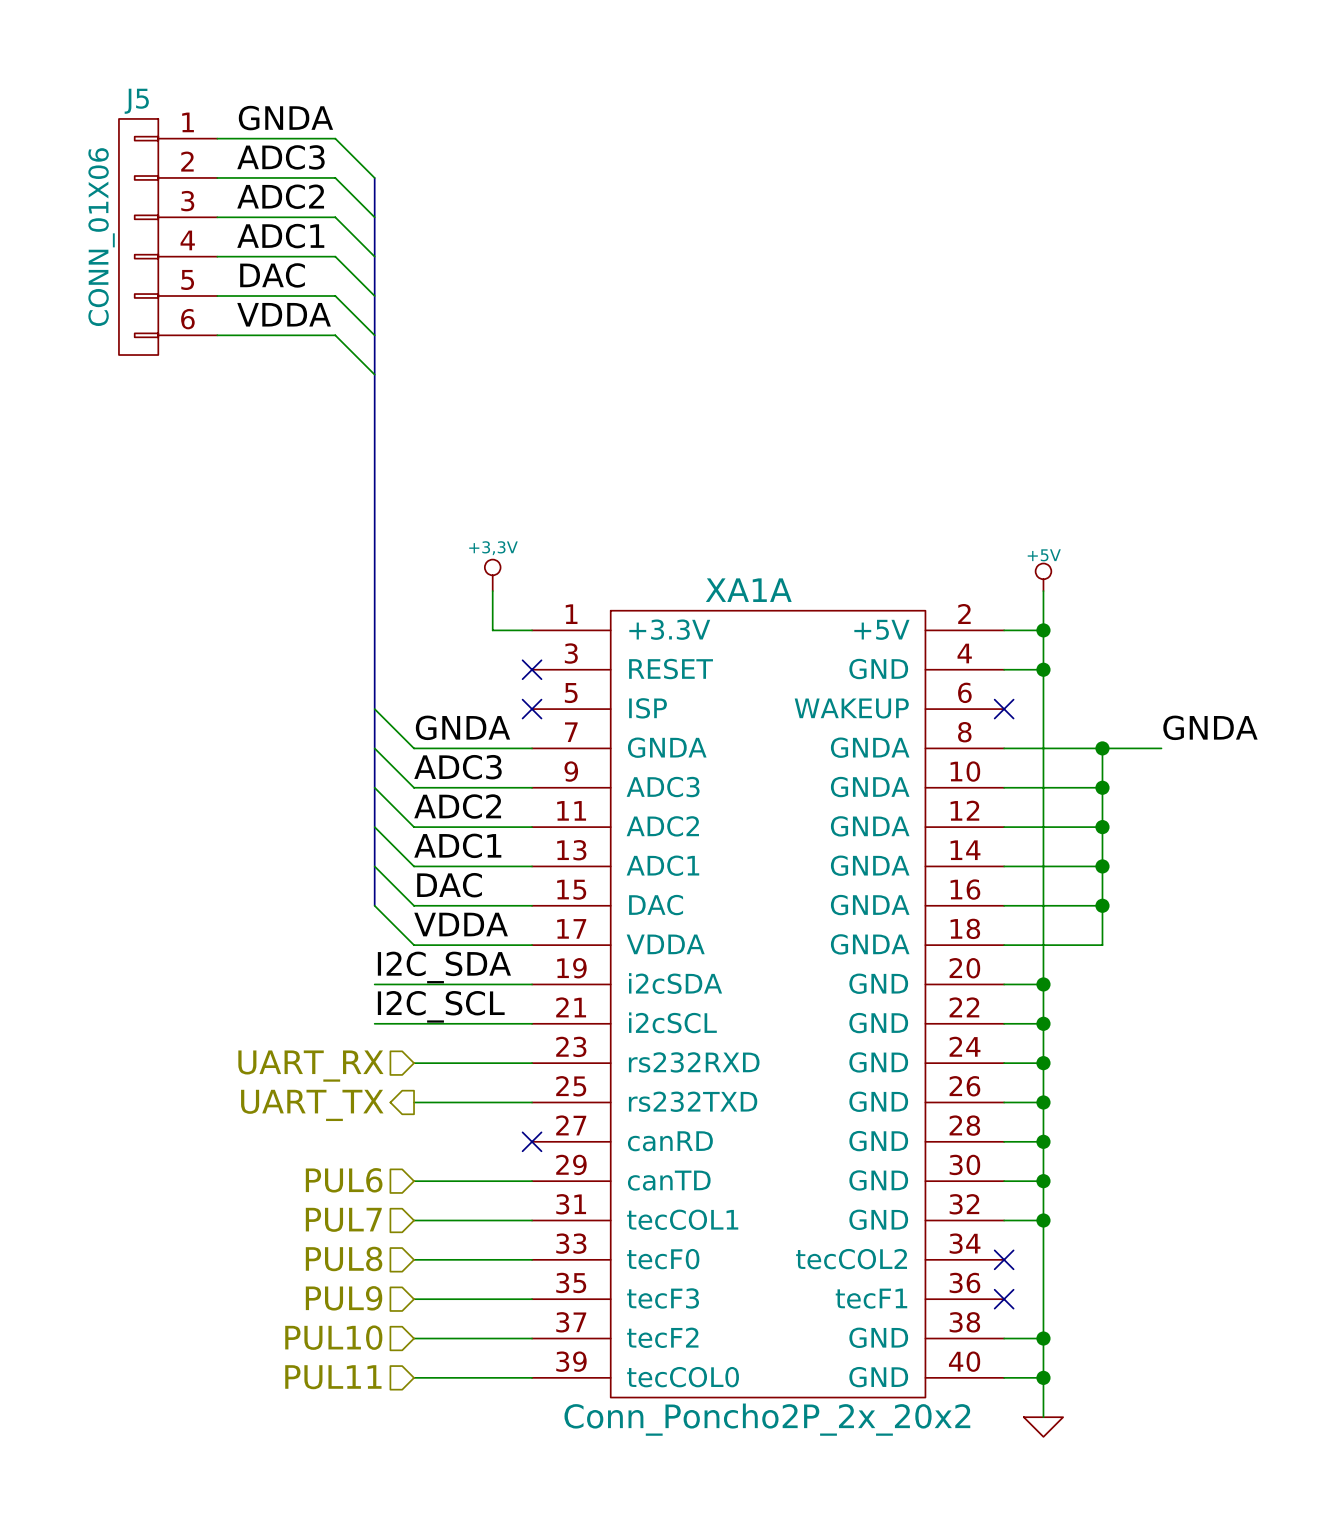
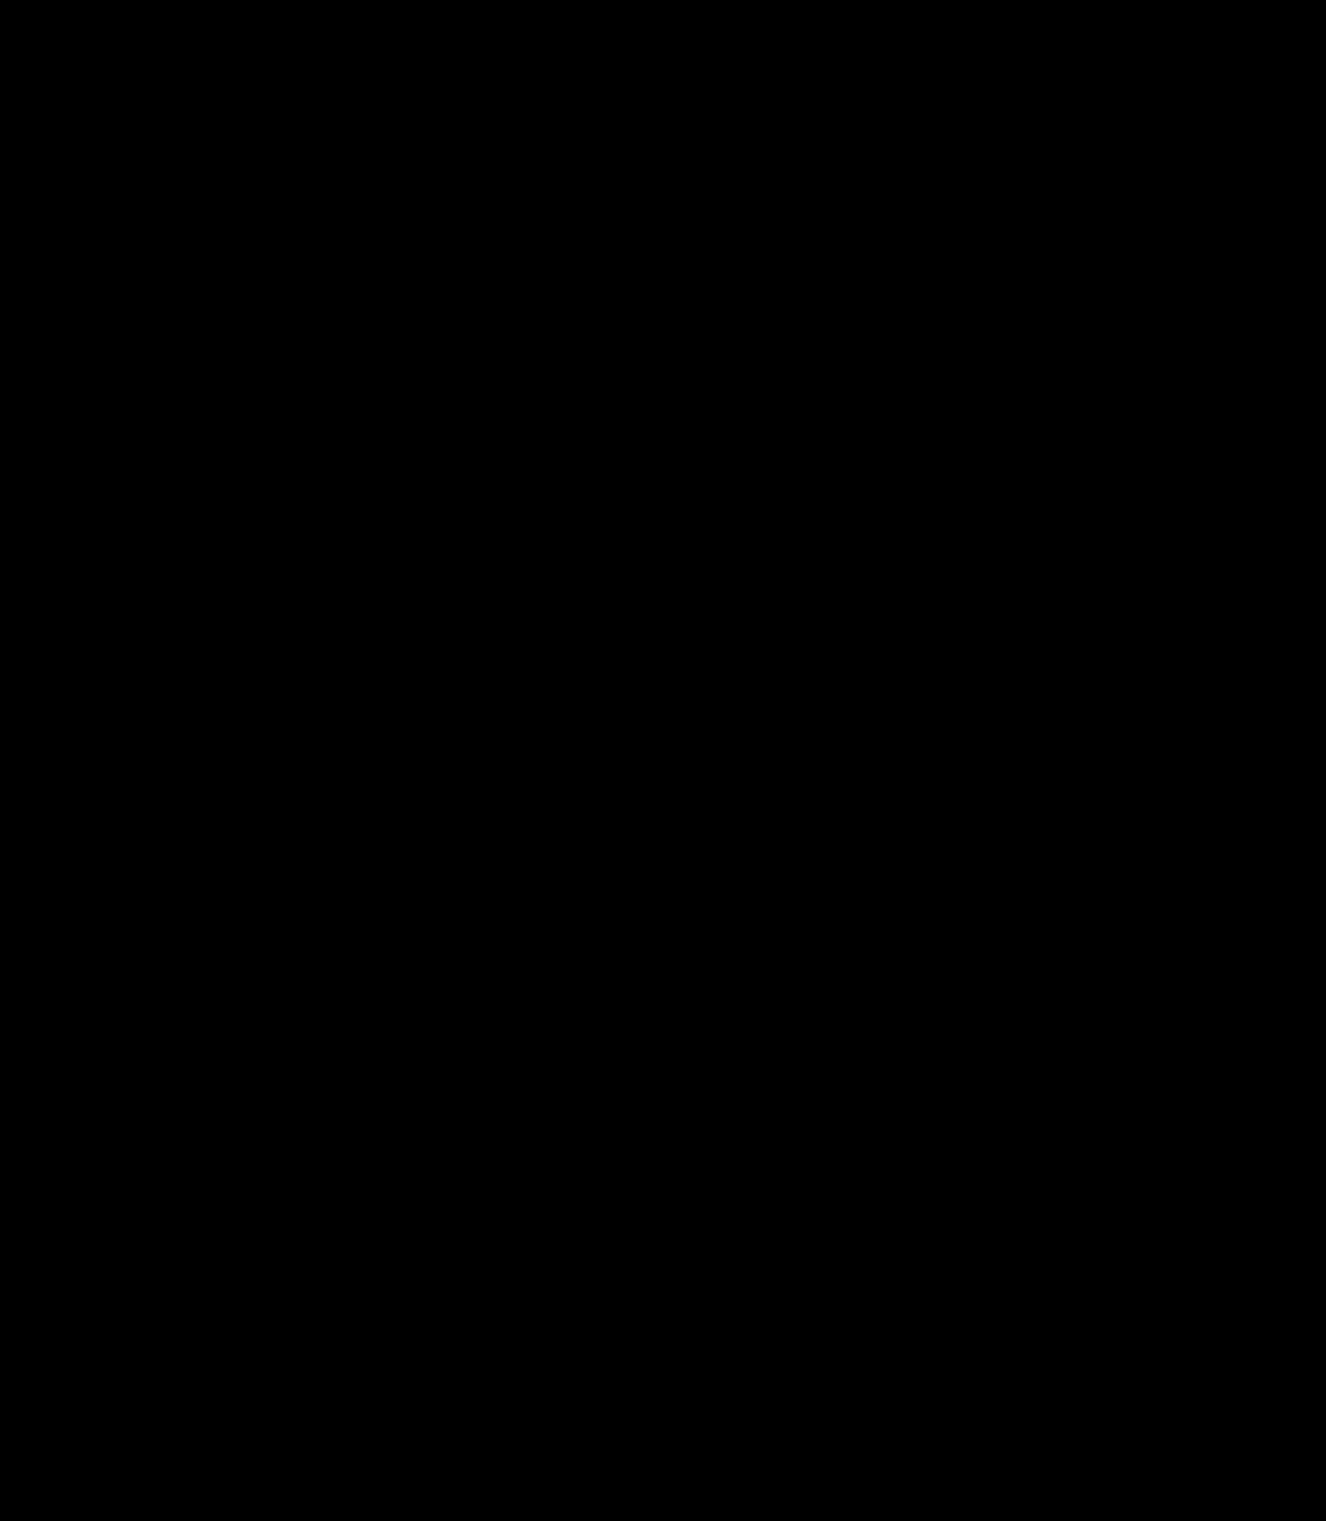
label: GNDA (285, 118) -> none
wire: (217, 138) (335, 138) (374, 177) -> none
label: ADC3 (280, 157) -> none
wire: (217, 177) (335, 177) (374, 217) -> none
bus: (374, 177) (374, 905) -> none
label: ADC2 (280, 196) -> none
wire: (217, 217) (335, 217) (374, 256) -> none
J5: CONN_01X06 (168, 236) -> none
label: ADC1 (280, 236) -> none
wire: (217, 256) (335, 256) (374, 296) -> none
label: DAC (272, 275) -> none
wire: (217, 296) (335, 296) (374, 335) -> none
label: VDDA (284, 314) -> none
wire: (217, 335) (335, 335) (374, 374) -> none
power symbol: +3,3V (492, 575) -> none
power symbol: +5V (1043, 577) -> none
wire: (492, 591) (492, 630) (532, 630) -> none
wire: (1043, 591) (1043, 1417) -> none
wire: (1004, 630) (1043, 630) -> none
junction: (1043, 630) -> none
no-connect mark: (532, 669) -> none
wire: (1004, 669) (1043, 669) -> none
junction: (1043, 669) -> none
wire: (374, 709) (414, 748) (532, 748) -> none
no-connect mark: (532, 709) -> none
no-connect mark: (1004, 709) -> none
label: GNDA (462, 727) -> none
label: GNDA (1210, 727) -> none
wire: (374, 748) (414, 787) (532, 787) -> none
wire: (1004, 748) (1161, 748) -> none
wire: (1102, 748) (1102, 945) (1004, 945) -> none
junction: (1102, 748) -> none
label: ADC3 (457, 767) -> none
wire: (374, 787) (414, 827) (532, 827) -> none
wire: (1004, 787) (1102, 787) -> none
junction: (1102, 787) -> none
label: ADC2 (457, 806) -> none
wire: (374, 827) (414, 866) (532, 866) -> none
wire: (1004, 827) (1102, 827) -> none
junction: (1102, 827) -> none
label: ADC1 (457, 845) -> none
wire: (374, 866) (414, 905) (532, 905) -> none
wire: (1004, 866) (1102, 866) -> none
junction: (1102, 866) -> none
label: DAC (449, 885) -> none
wire: (374, 905) (414, 945) (532, 945) -> none
wire: (1004, 905) (1102, 905) -> none
junction: (1102, 905) -> none
label: VDDA (461, 924) -> none
label: I2C_SDA (444, 967) -> none
wire: (374, 984) (532, 984) -> none
wire: (1004, 984) (1043, 984) -> none
junction: (1043, 984) -> none
XA1A: Conn_Poncho2P_2x_20x2 (768, 1004) -> none
label: I2C_SCL (441, 1006) -> none
wire: (374, 1023) (532, 1023) -> none
wire: (1004, 1023) (1043, 1023) -> none
junction: (1043, 1023) -> none
wire: (414, 1063) (532, 1063) -> none
wire: (1004, 1063) (1043, 1063) -> none
junction: (1043, 1063) -> none
hierarchical label: UART_RX (310, 1066) -> none
wire: (414, 1102) (532, 1102) -> none
wire: (1004, 1102) (1043, 1102) -> none
junction: (1043, 1102) -> none
hierarchical label: UART_TX (312, 1105) -> none
no-connect mark: (532, 1141) -> none
wire: (1004, 1141) (1043, 1141) -> none
junction: (1043, 1141) -> none
hierarchical label: PUL6 (344, 1180) -> none
wire: (414, 1181) (532, 1181) -> none
wire: (1004, 1181) (1043, 1181) -> none
junction: (1043, 1181) -> none
hierarchical label: PUL7 (343, 1219) -> none
wire: (414, 1220) (532, 1220) -> none
wire: (1004, 1220) (1043, 1220) -> none
junction: (1043, 1220) -> none
hierarchical label: PUL8 (344, 1258) -> none
wire: (414, 1259) (532, 1259) -> none
no-connect mark: (1004, 1259) -> none
hierarchical label: PUL9 (344, 1298) -> none
wire: (414, 1299) (532, 1299) -> none
no-connect mark: (1004, 1299) -> none
hierarchical label: PUL10 (333, 1337) -> none
wire: (414, 1338) (532, 1338) -> none
wire: (1004, 1338) (1043, 1338) -> none
junction: (1043, 1338) -> none
hierarchical label: PUL11 (333, 1377) -> none
wire: (414, 1377) (532, 1377) -> none
wire: (1004, 1377) (1043, 1377) -> none
junction: (1043, 1377) -> none
power symbol: (1043, 1427) -> none

